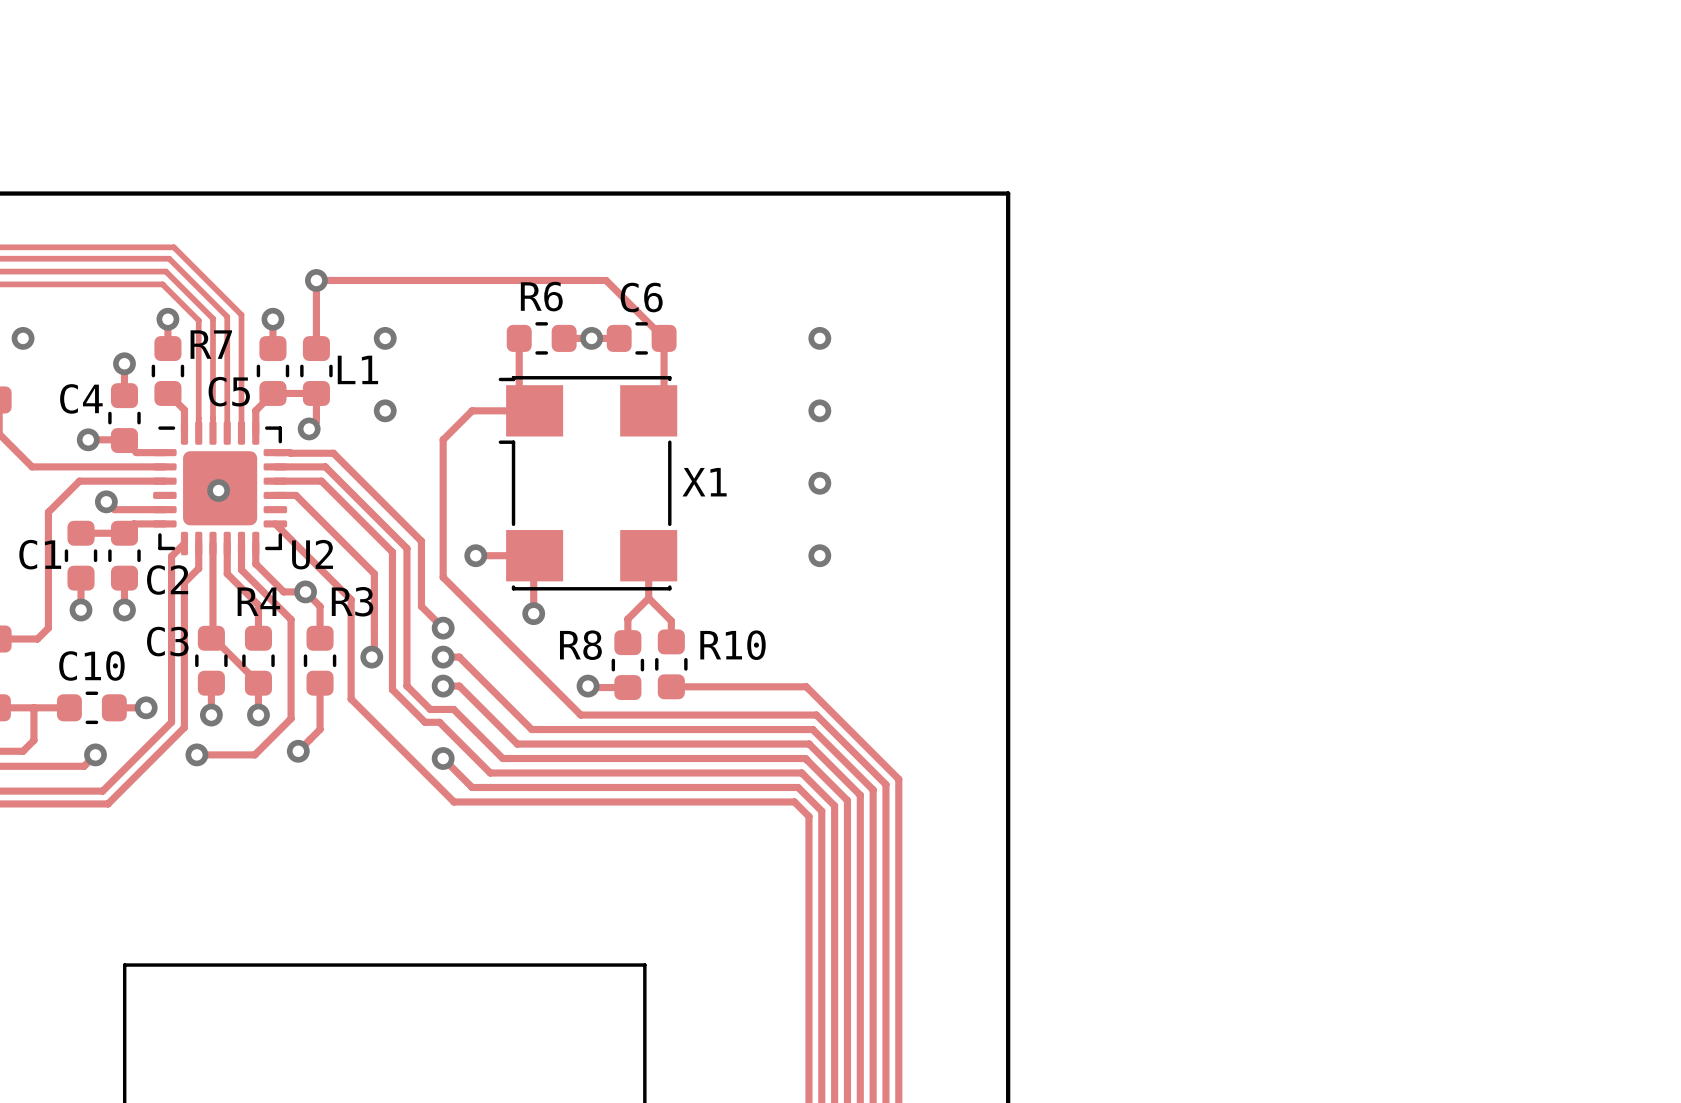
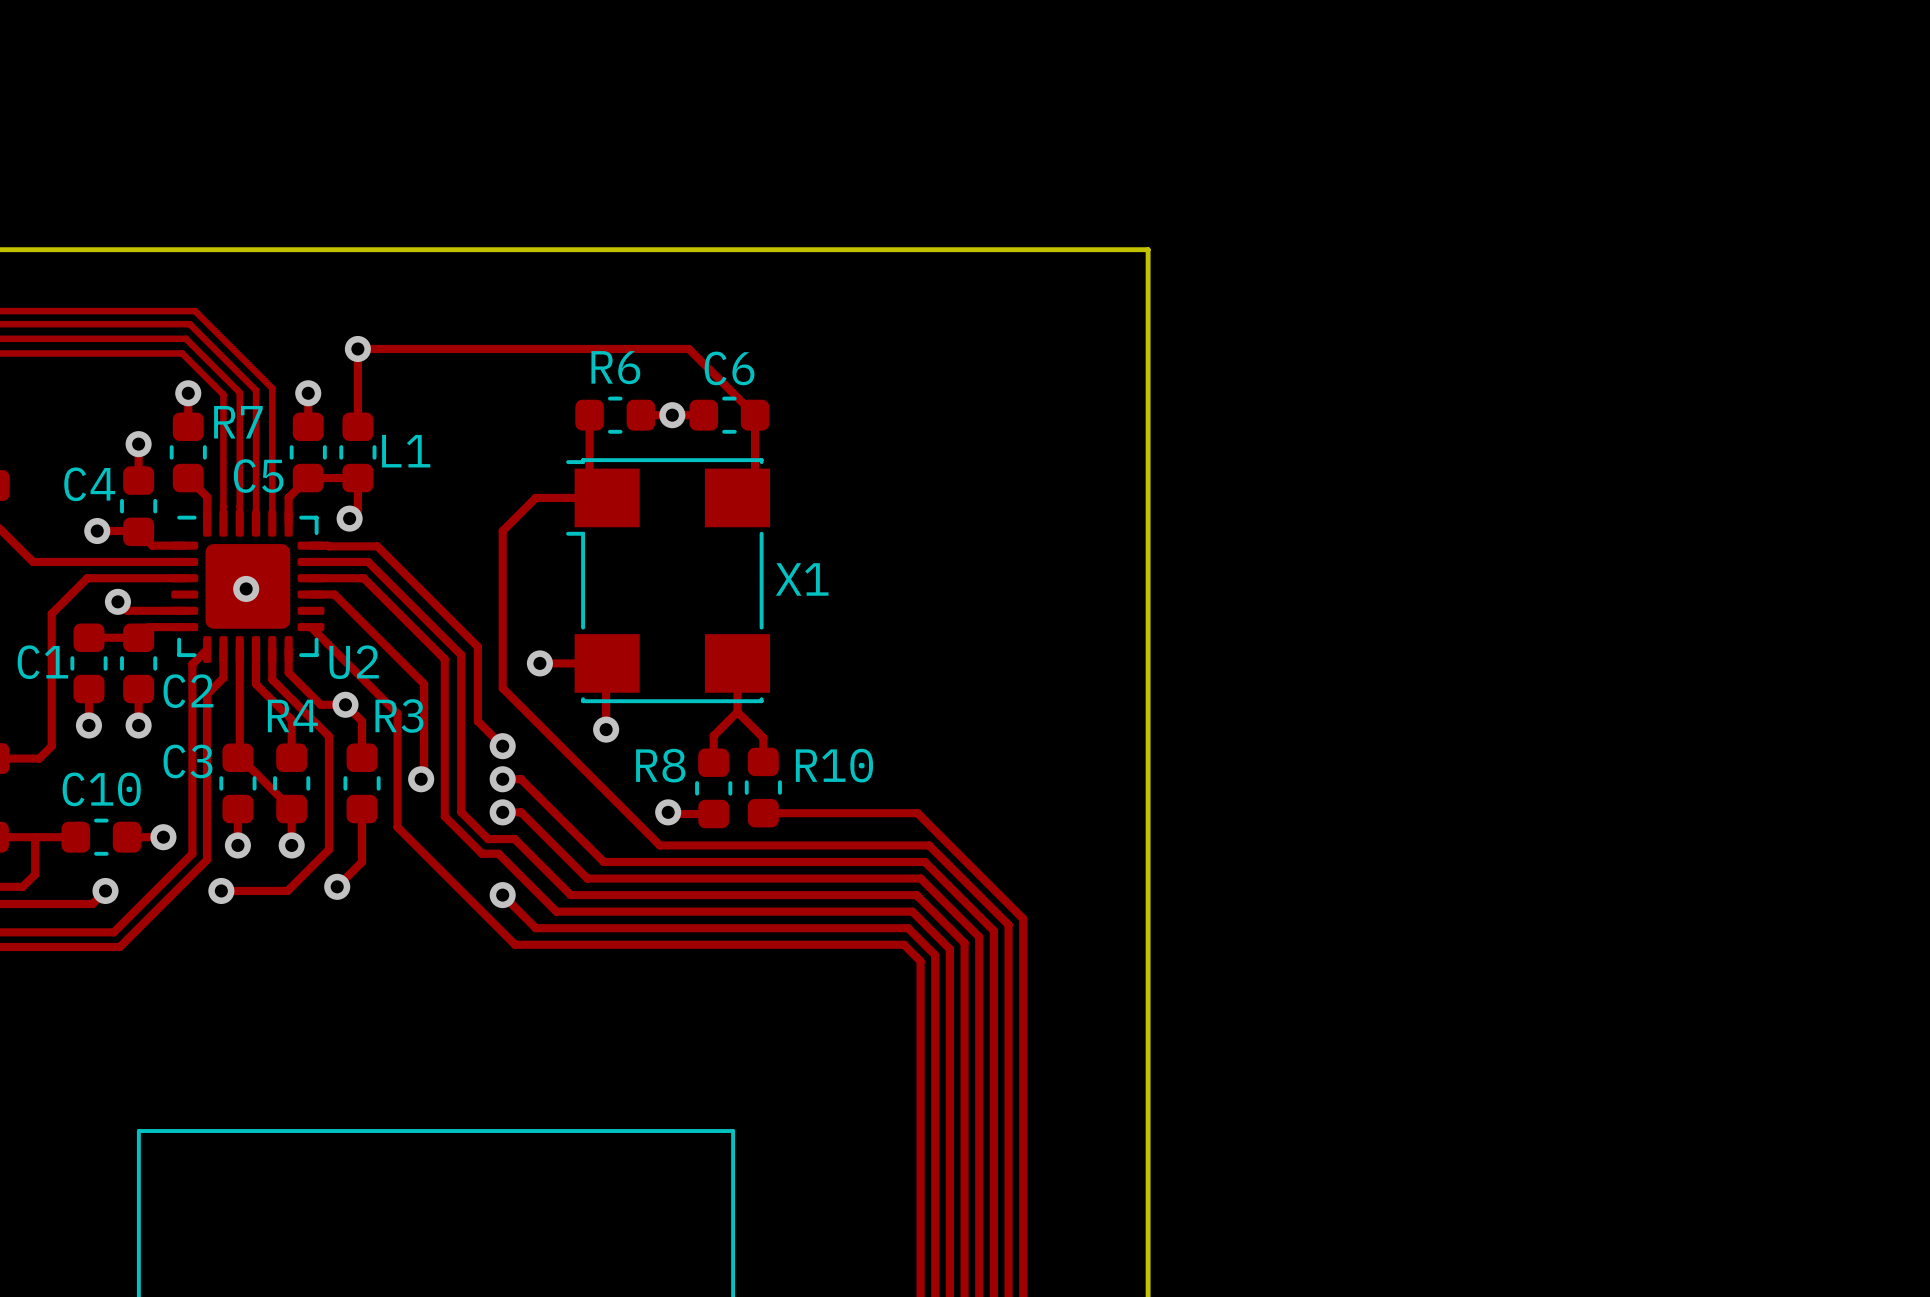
via: (23, 338) -> none
via: (385, 338) -> none
via: (819, 338) -> none
via: (385, 410) -> none
via: (819, 410) -> none
via: (819, 483) -> none
via: (819, 555) -> none

